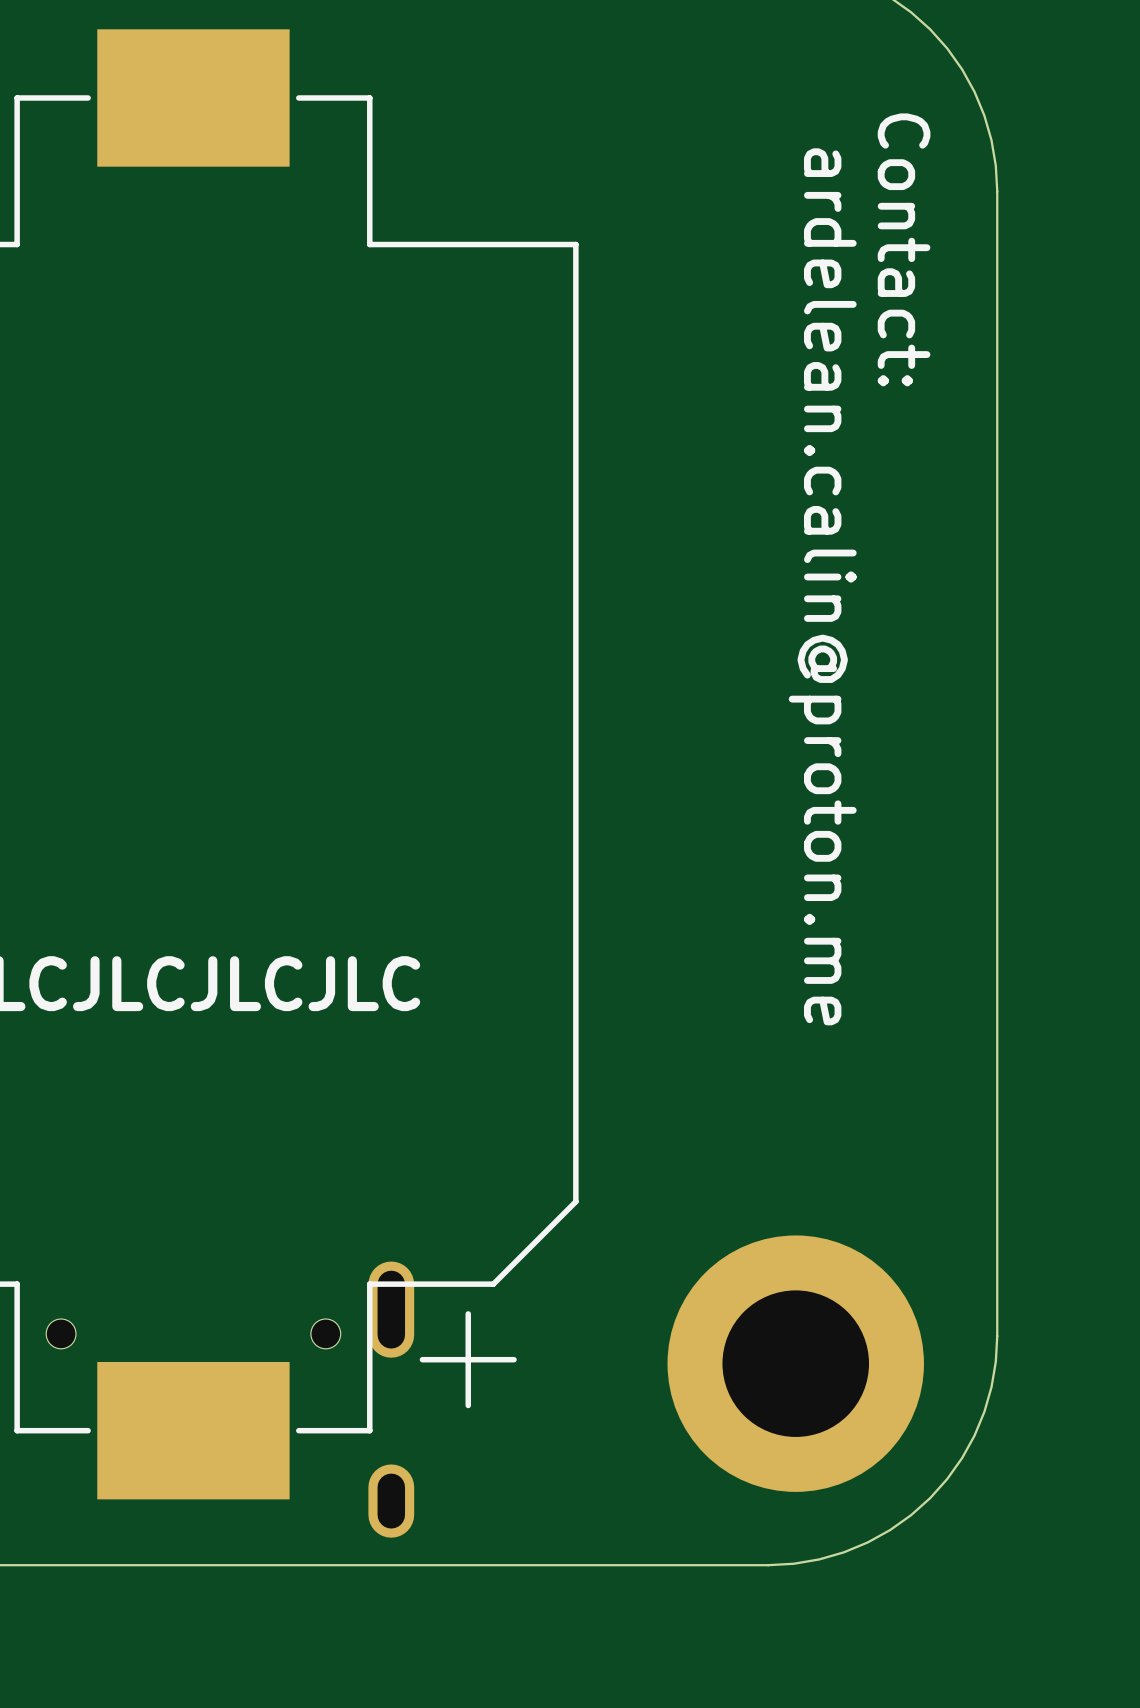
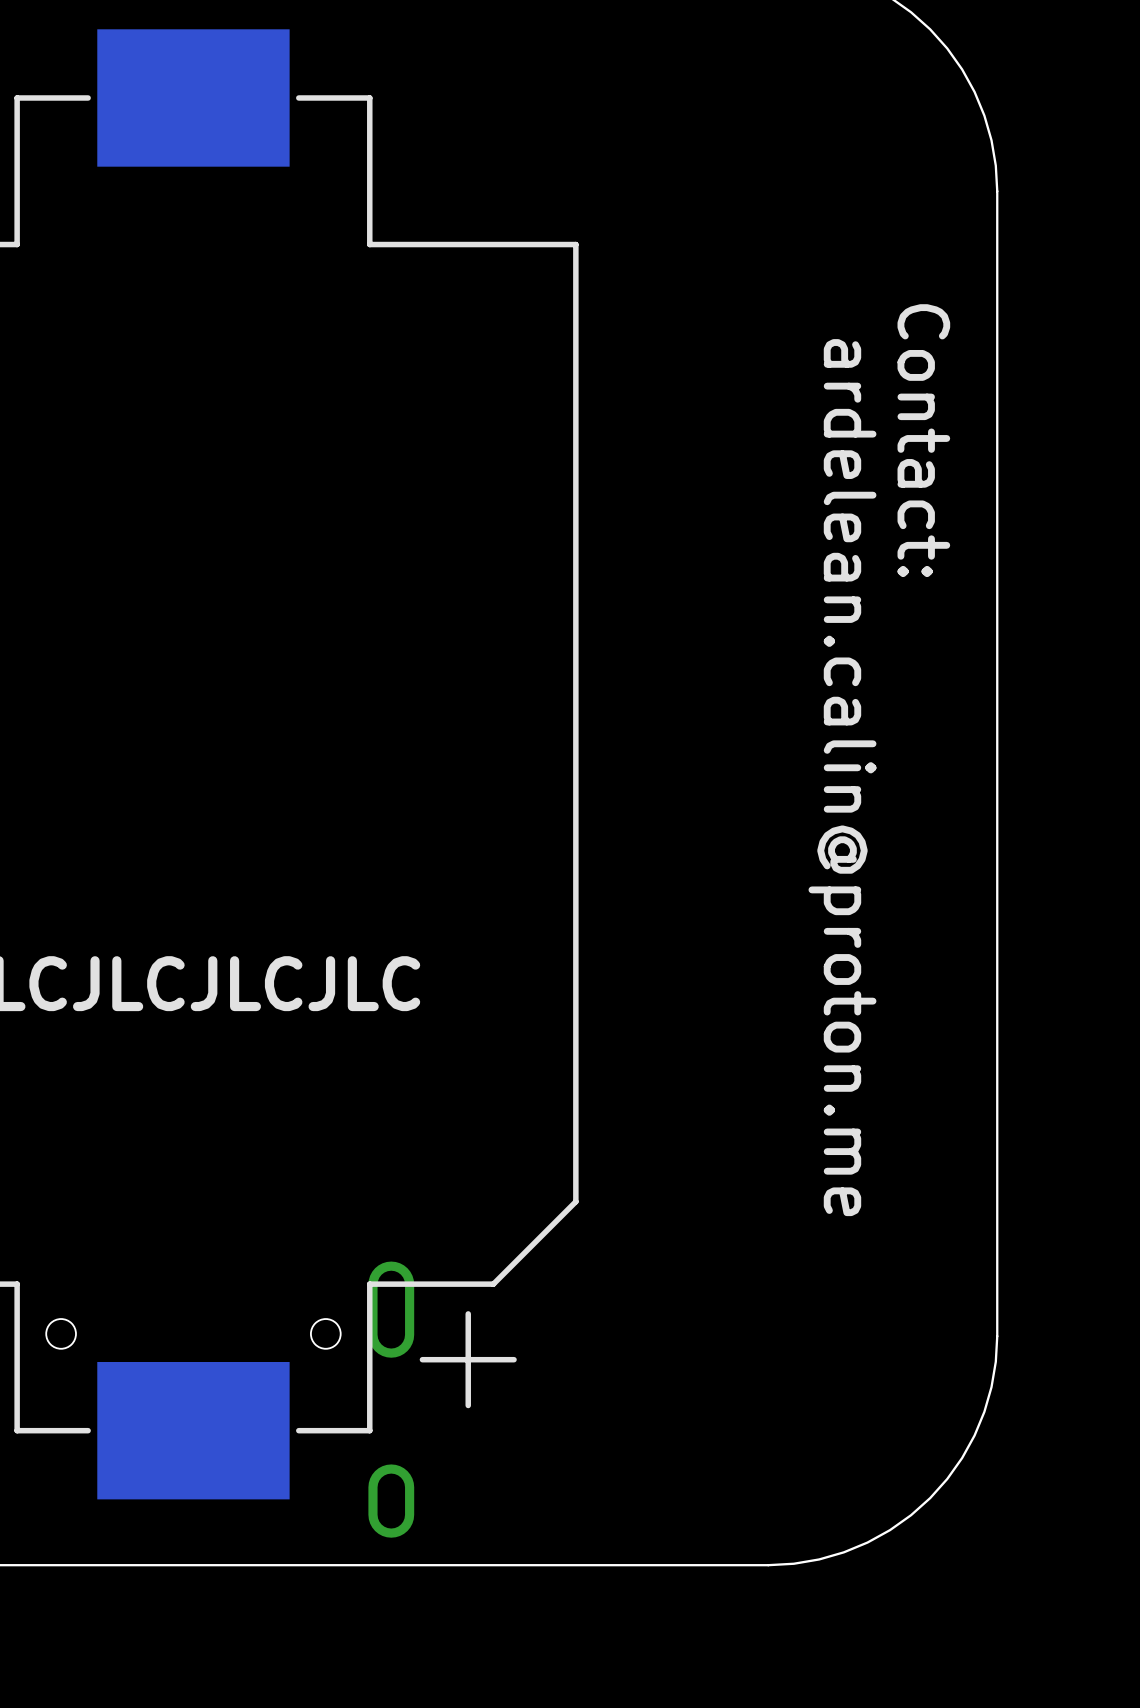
text position: Contact: (904, 249) -> Contact: (923, 440)
text position: ardelean.calin@proton.me (822, 586) -> ardelean.calin@proton.me (842, 777)
part: (795, 1363) -> none

